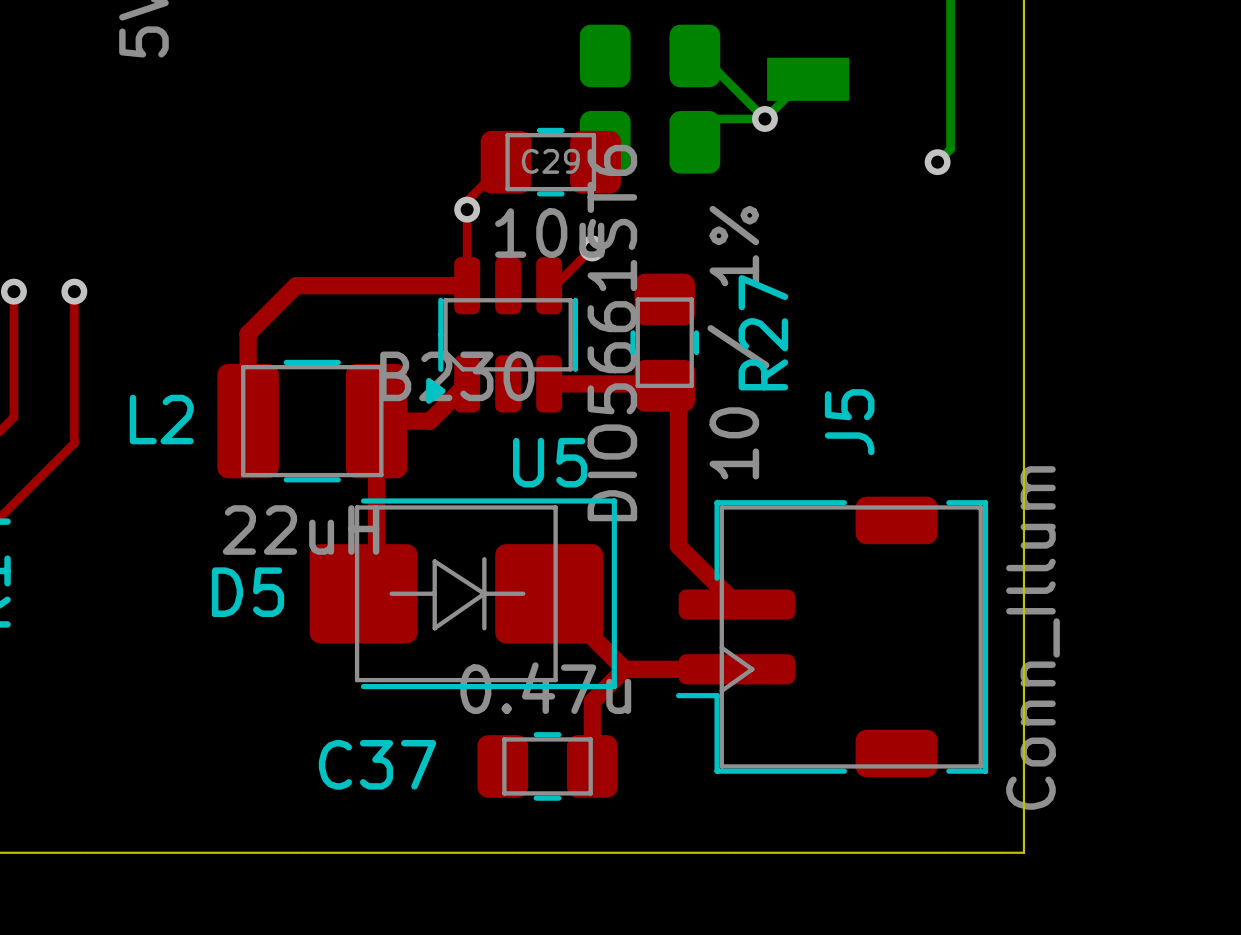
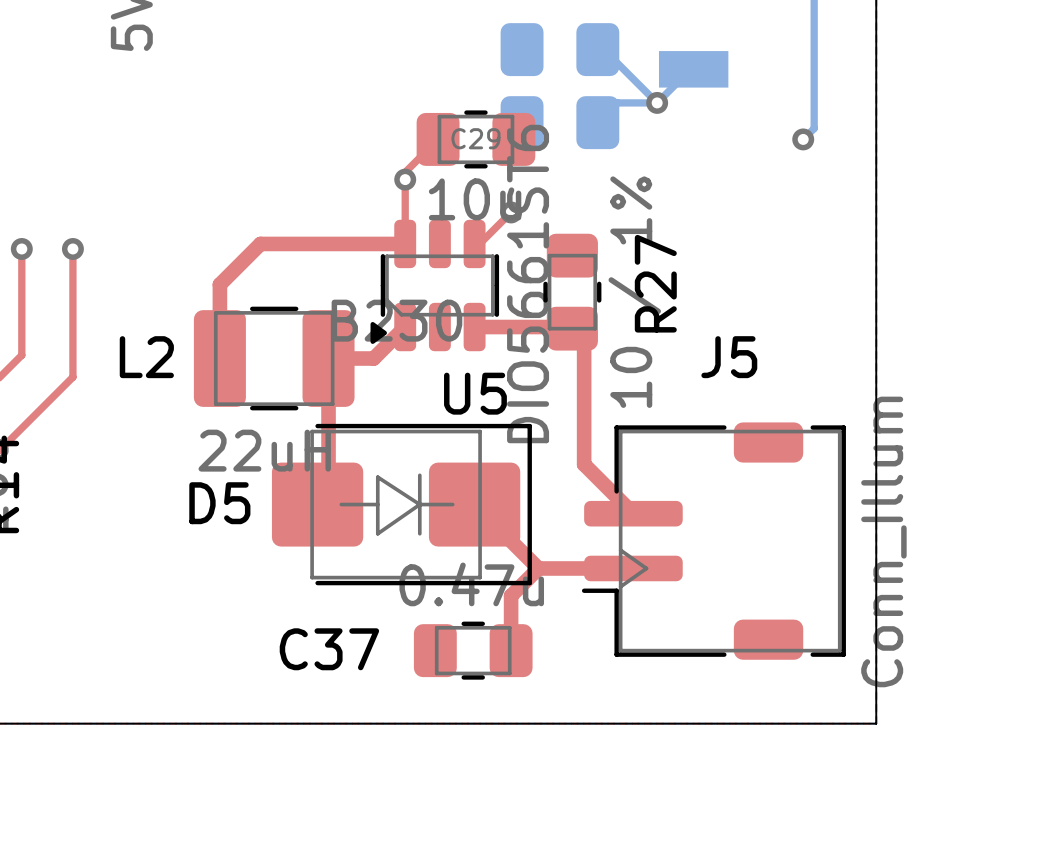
J5 name rotation: 0° (849, 422) -> 90° clockwise (729, 357)

